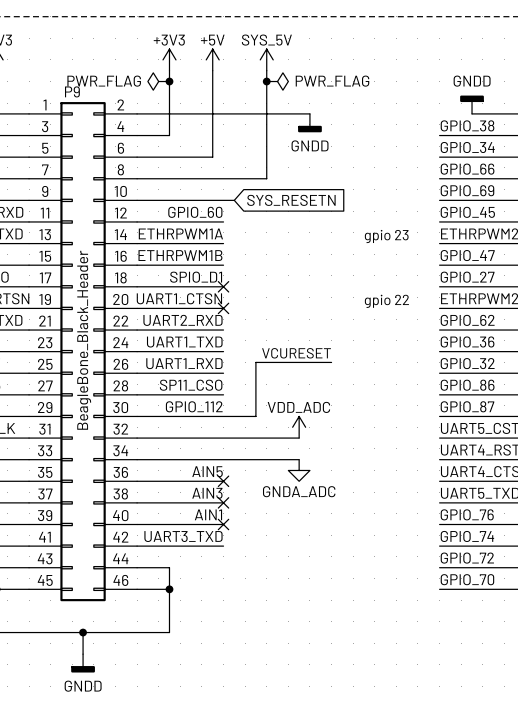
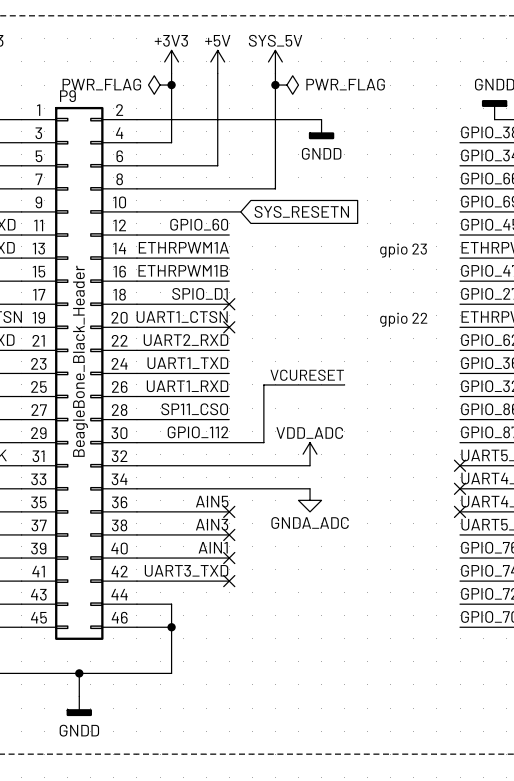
no-connect mark: none -> (460, 465)
no-connect mark: none -> (460, 488)
no-connect mark: none -> (460, 511)
no-connect mark: none -> (229, 581)

